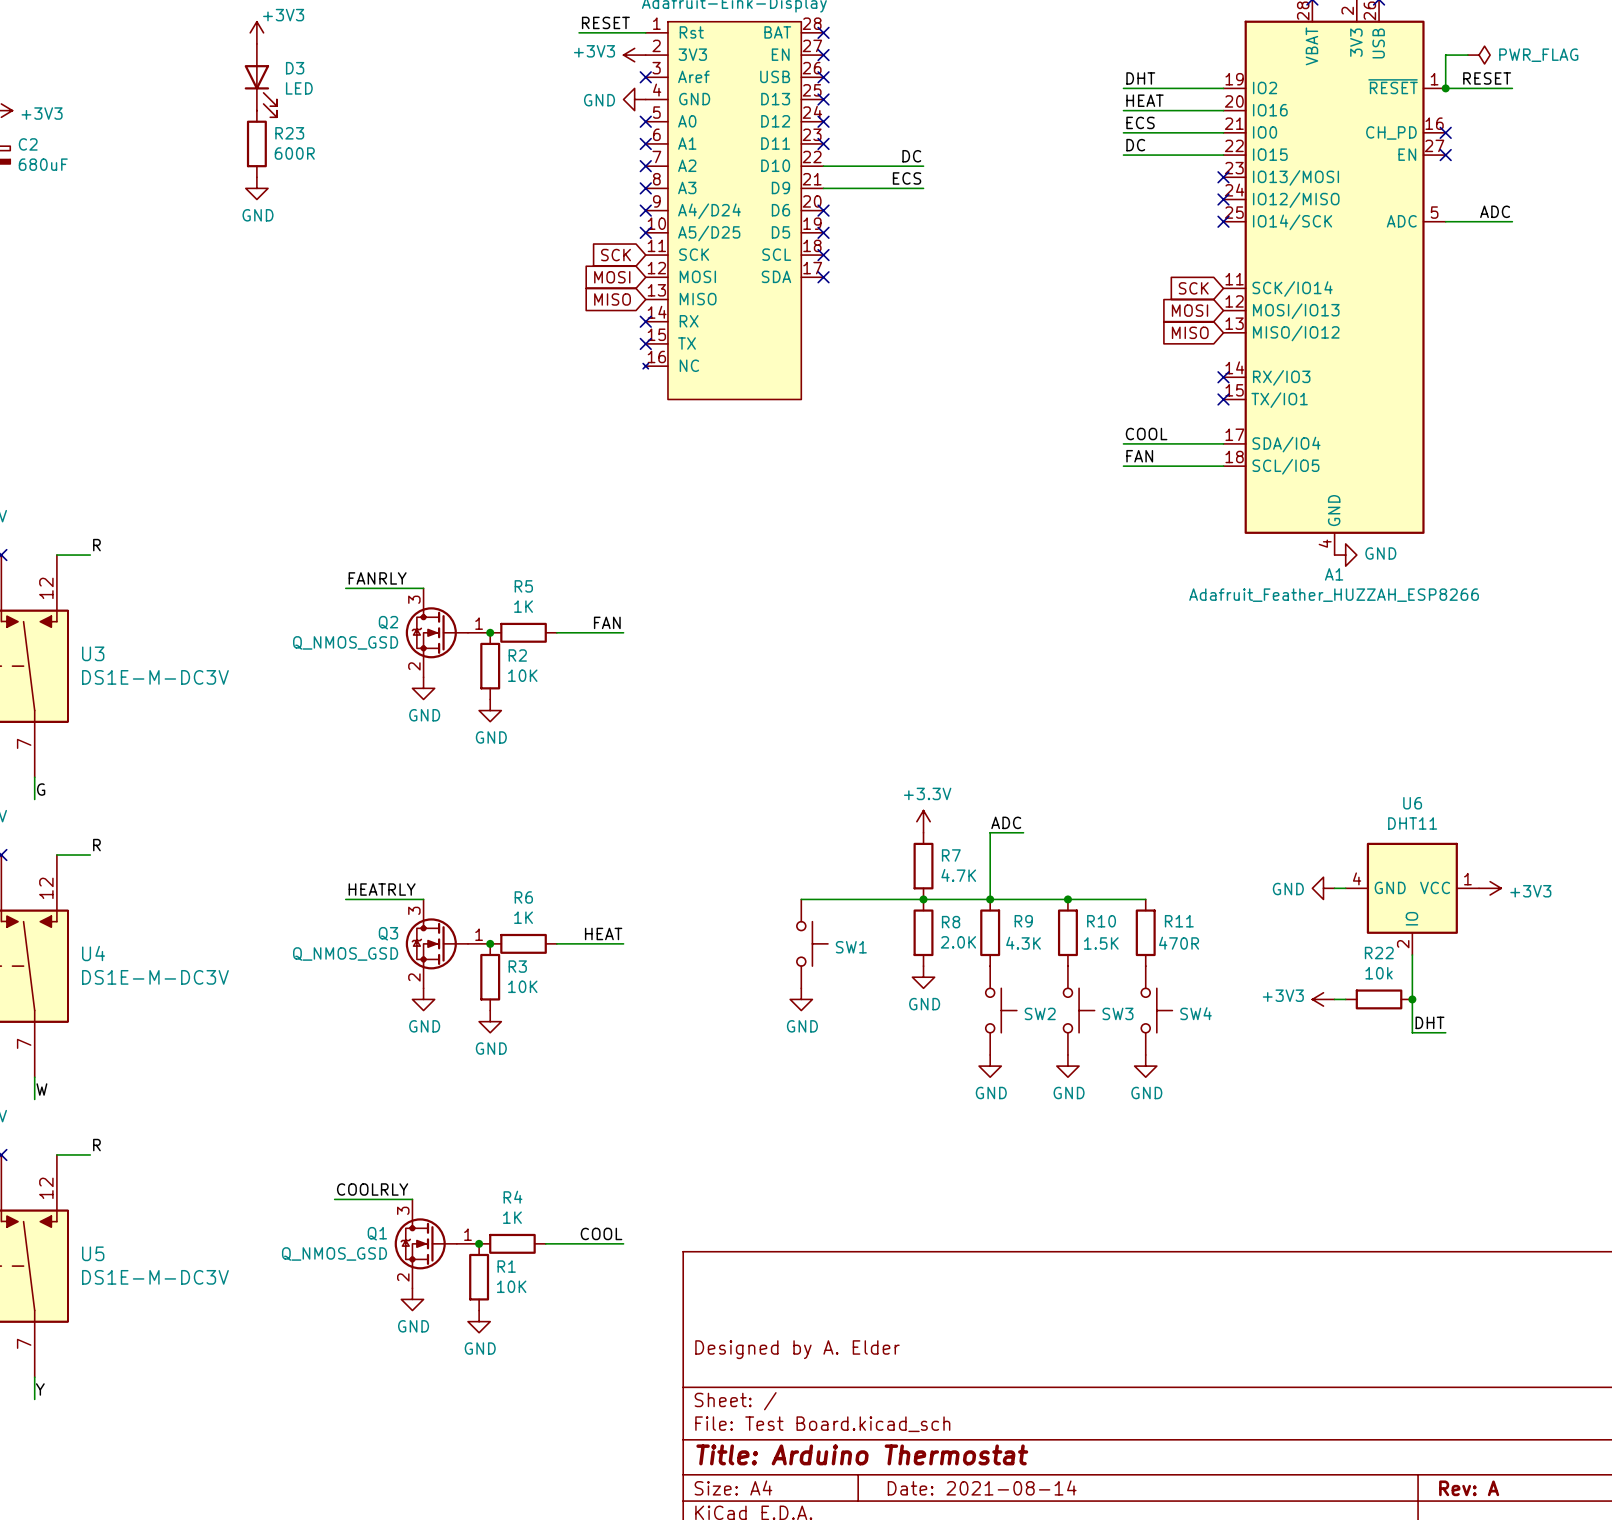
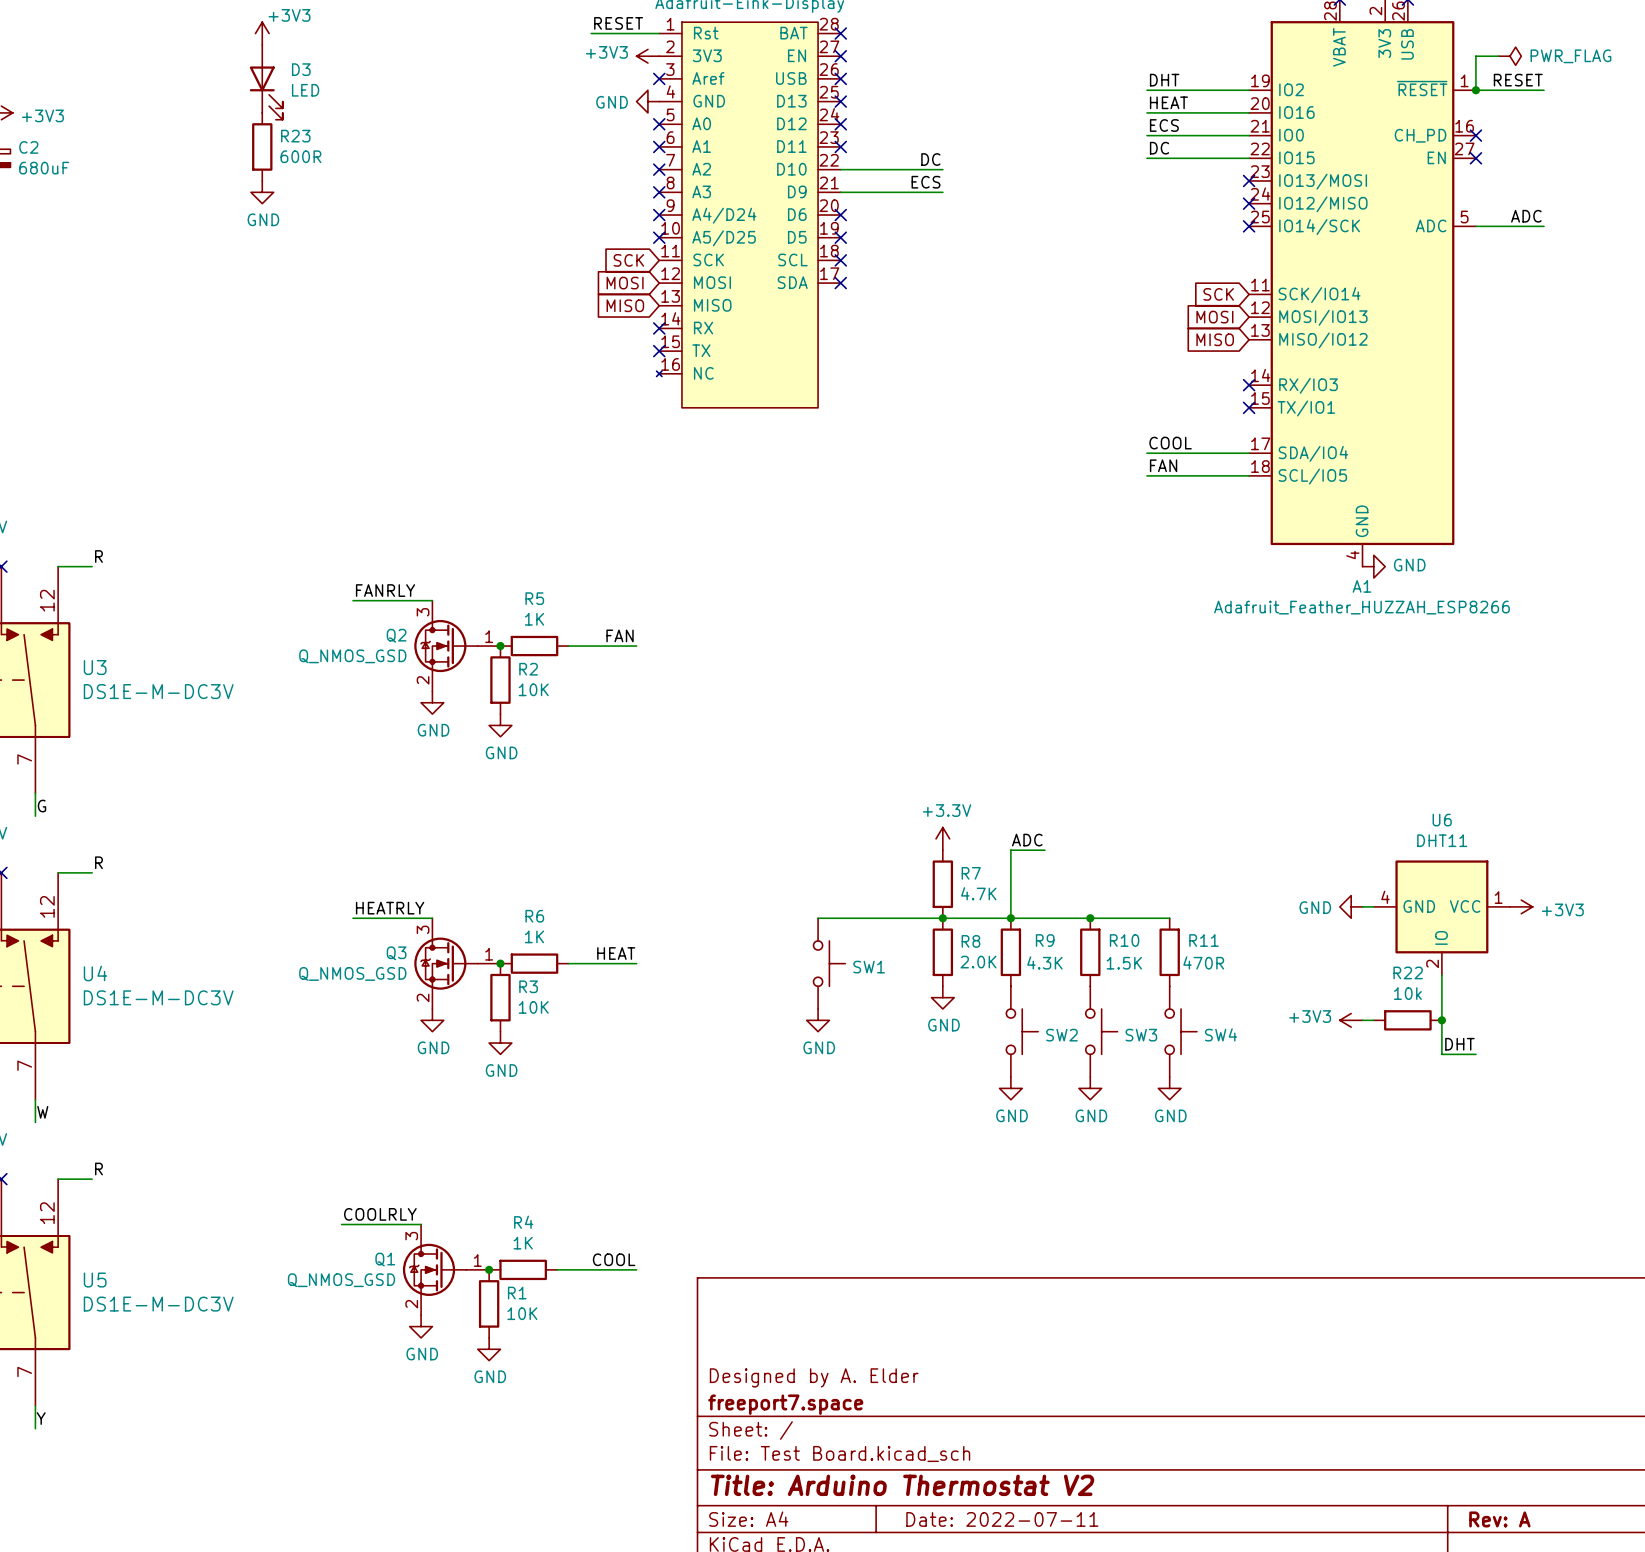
title block: none -> freeport7.space (785, 1404)
title block: Title: Arduino Thermostat (862, 1454) -> Title: Arduino Thermostat V2 (902, 1485)
title block: Date: 2021-08-14 (982, 1488) -> Date: 2022-07-11 (1002, 1519)

